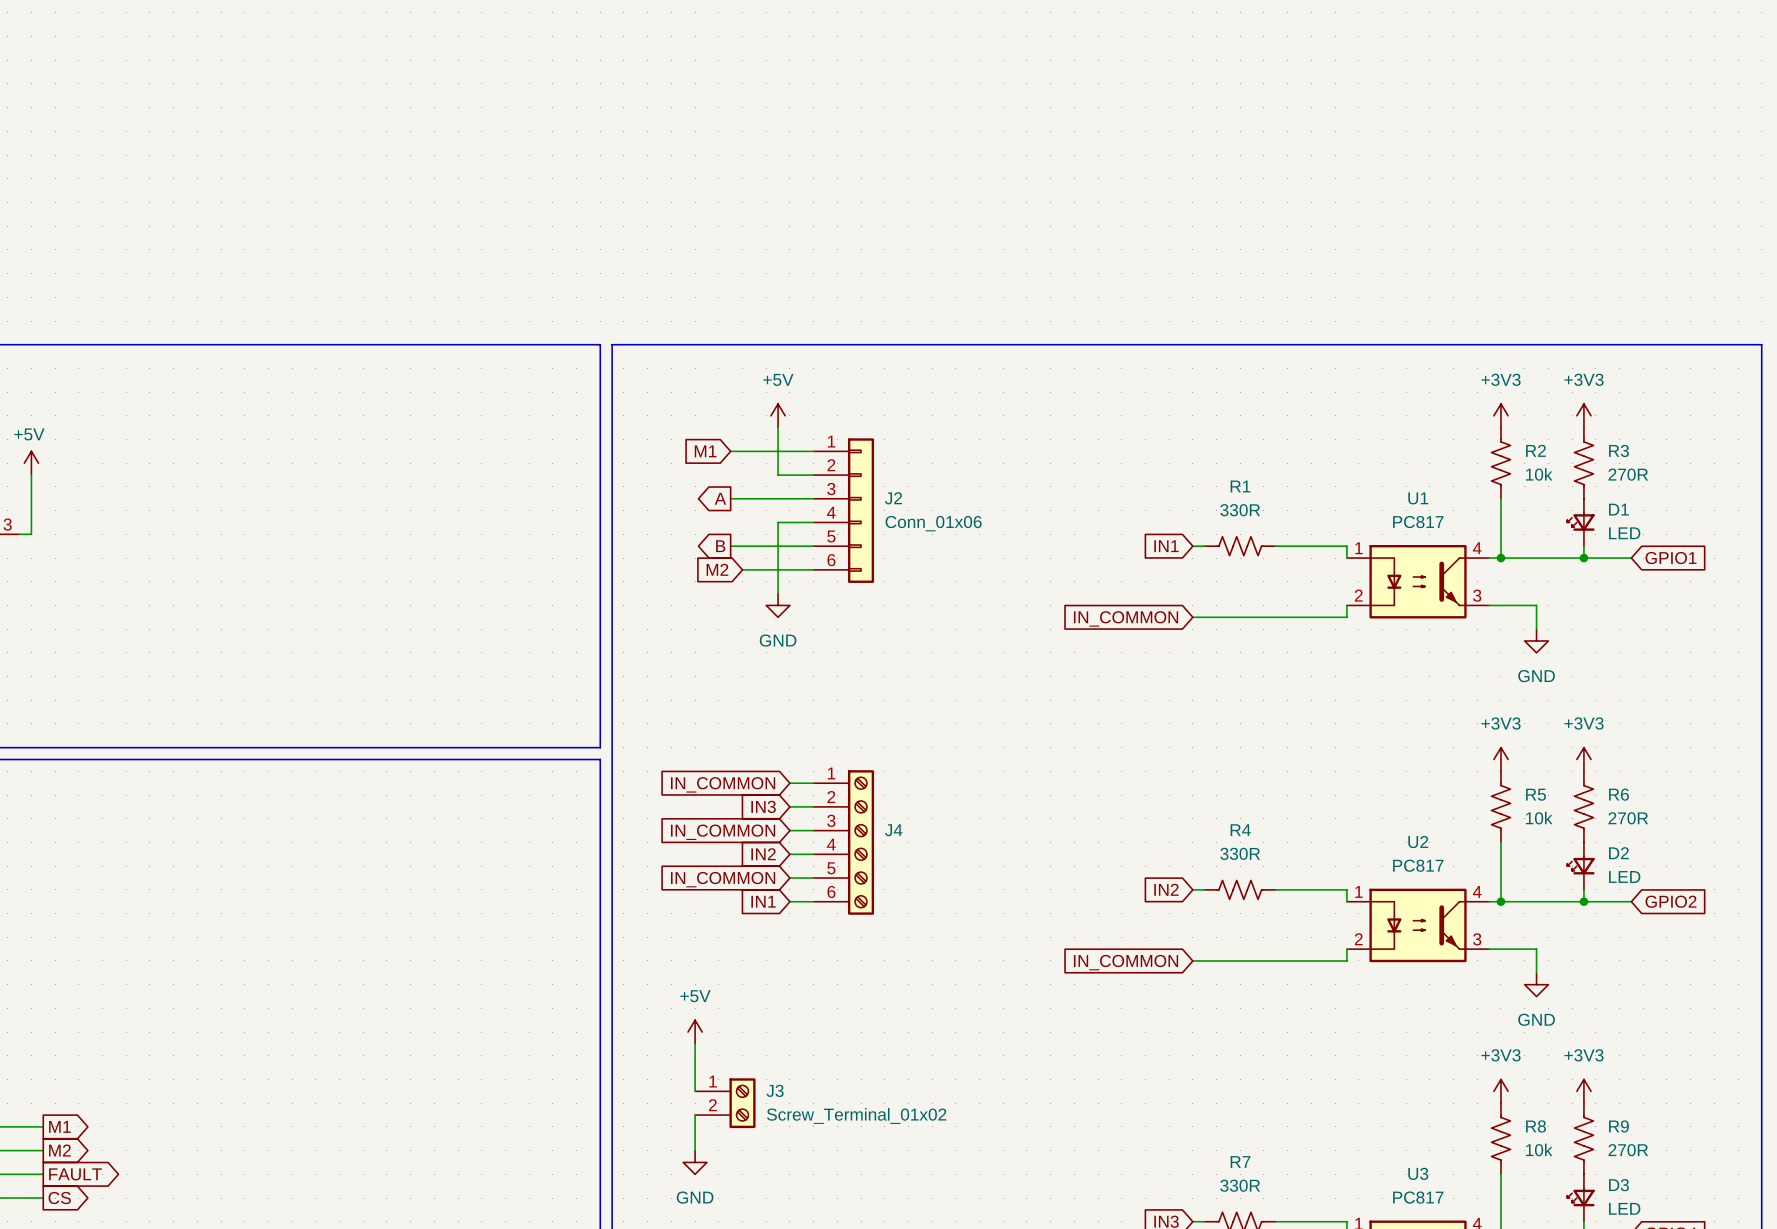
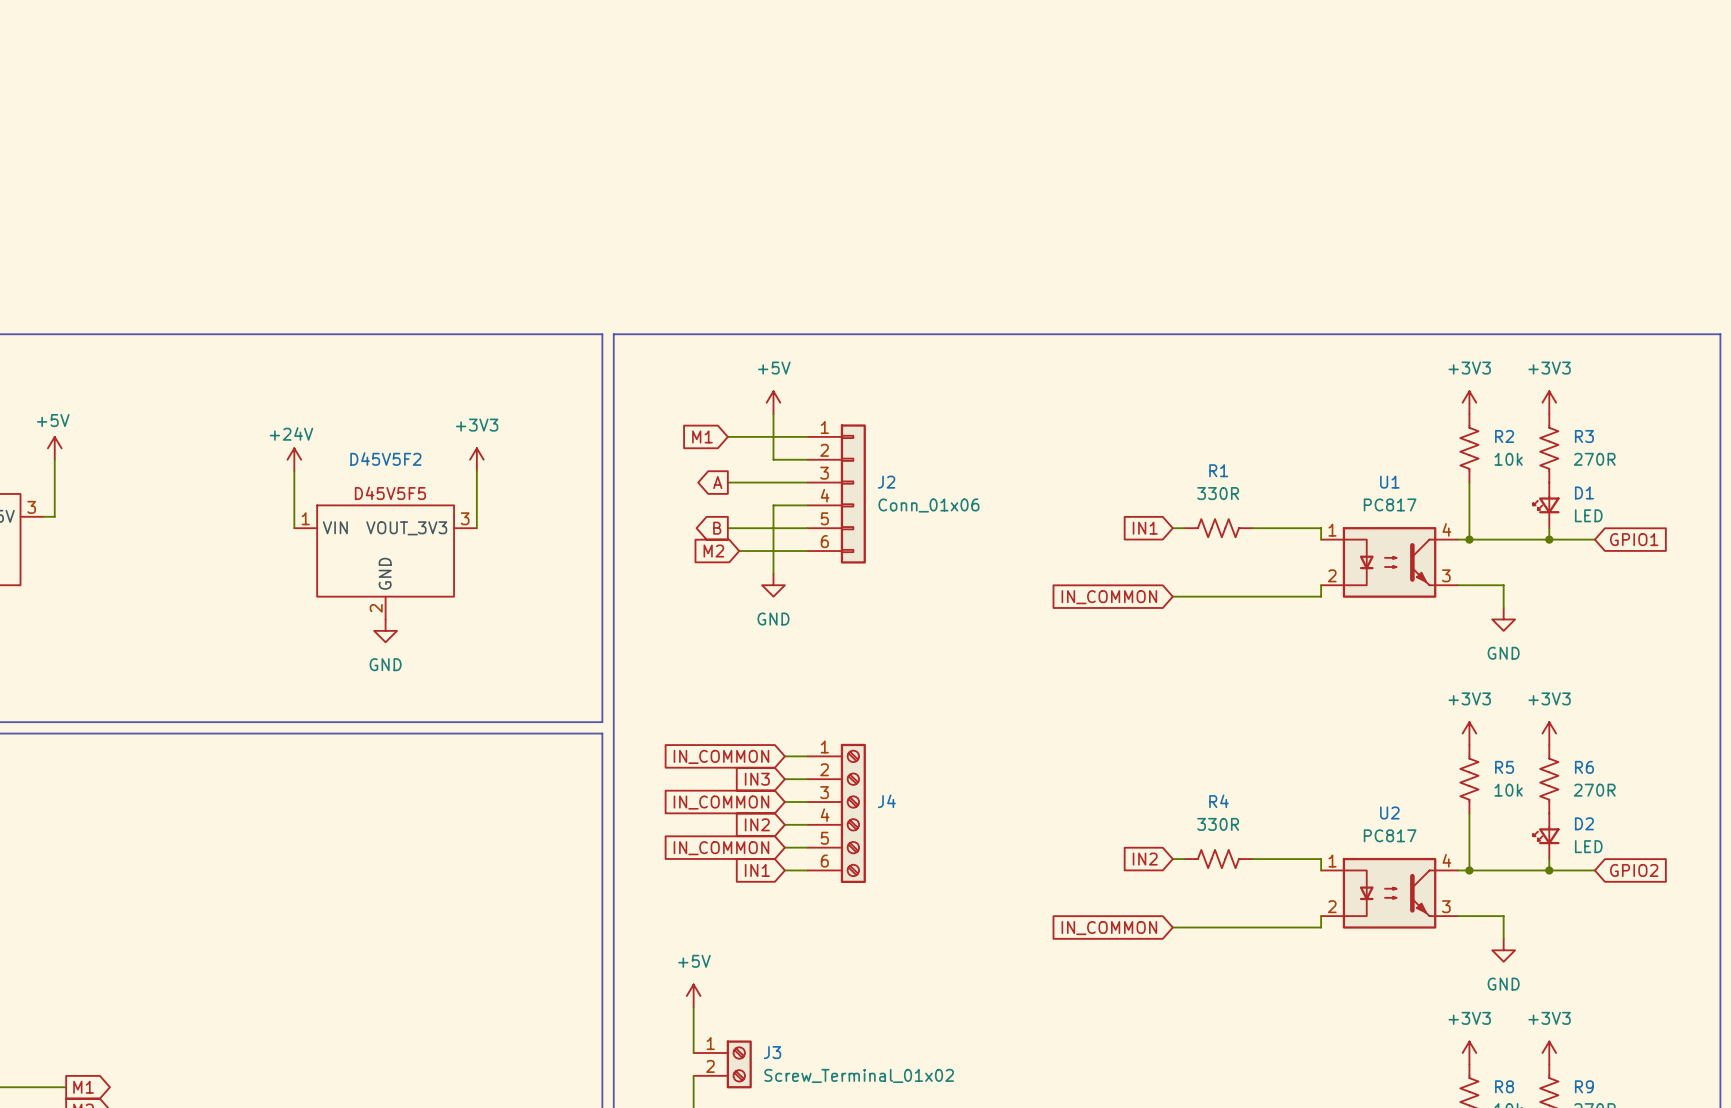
power symbol: none -> +24V (294, 459)
power symbol: none -> +3V3 (476, 459)
wire: none -> (294, 471) (294, 528)
wire: none -> (476, 471) (476, 528)
D45V5F2: none -> (385, 562)
power symbol: none -> GND (385, 630)

